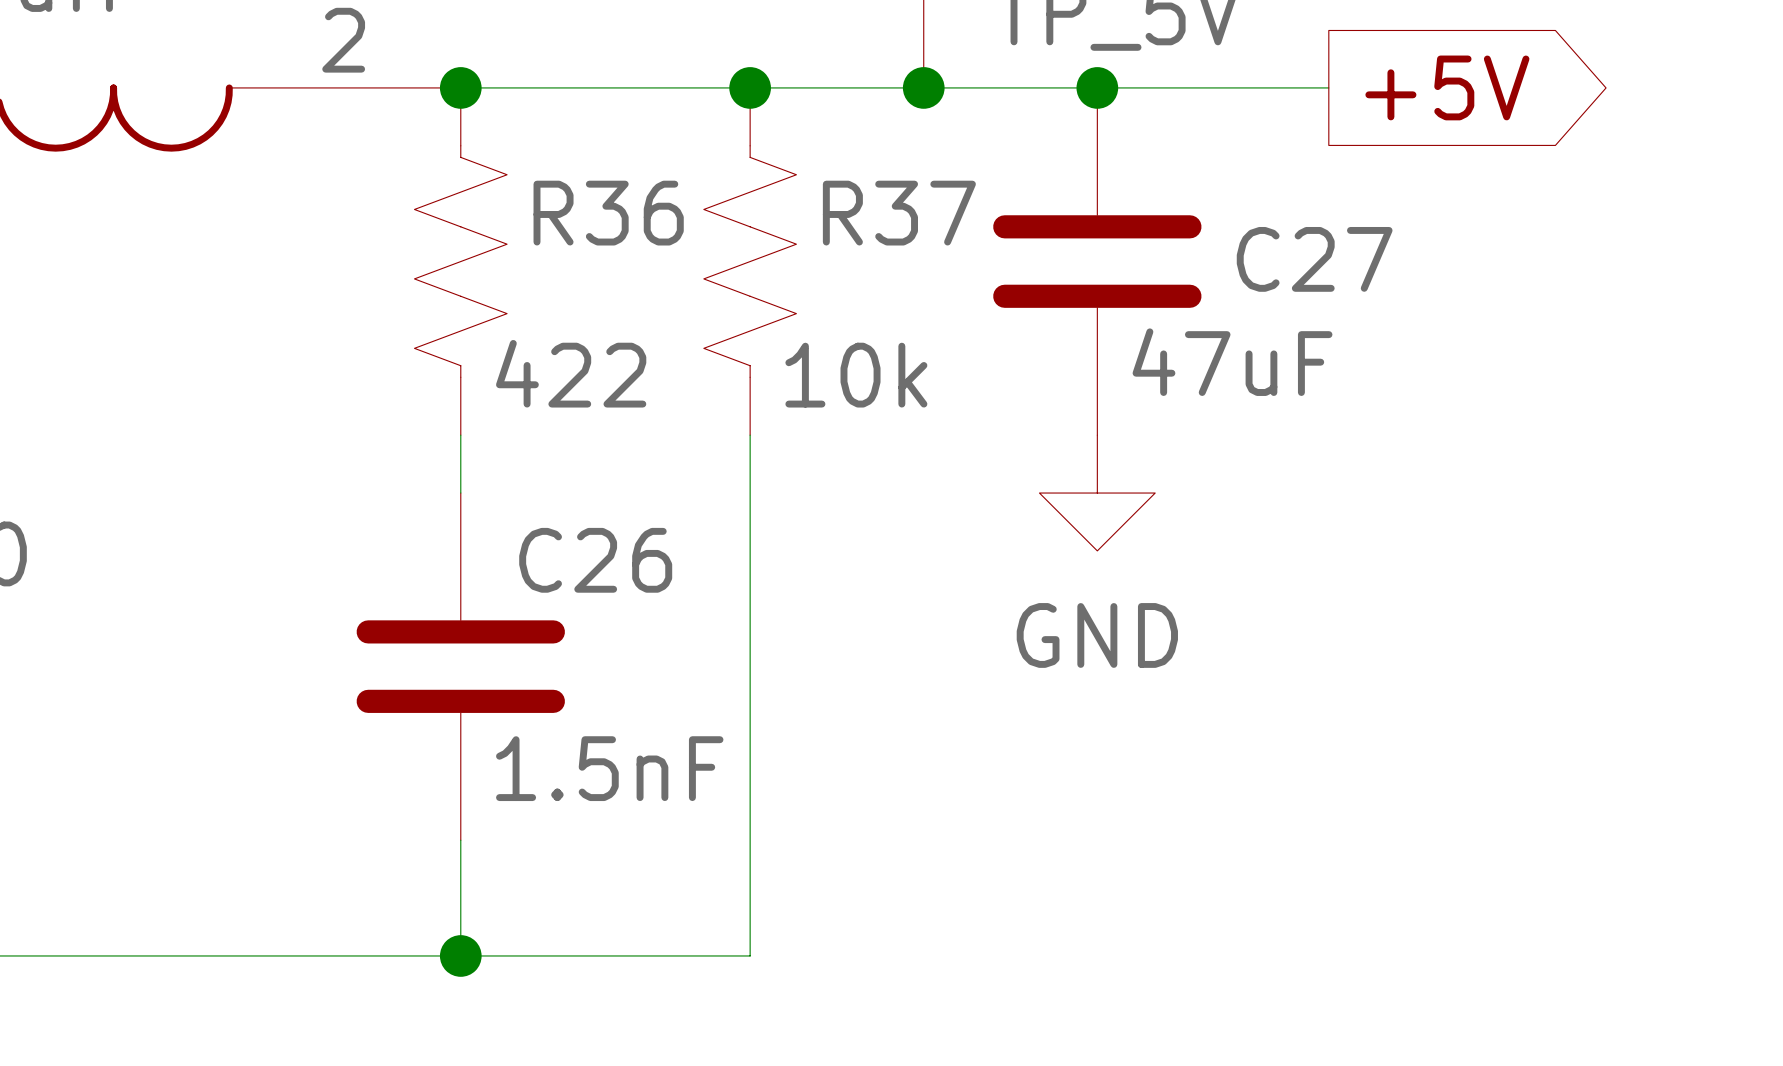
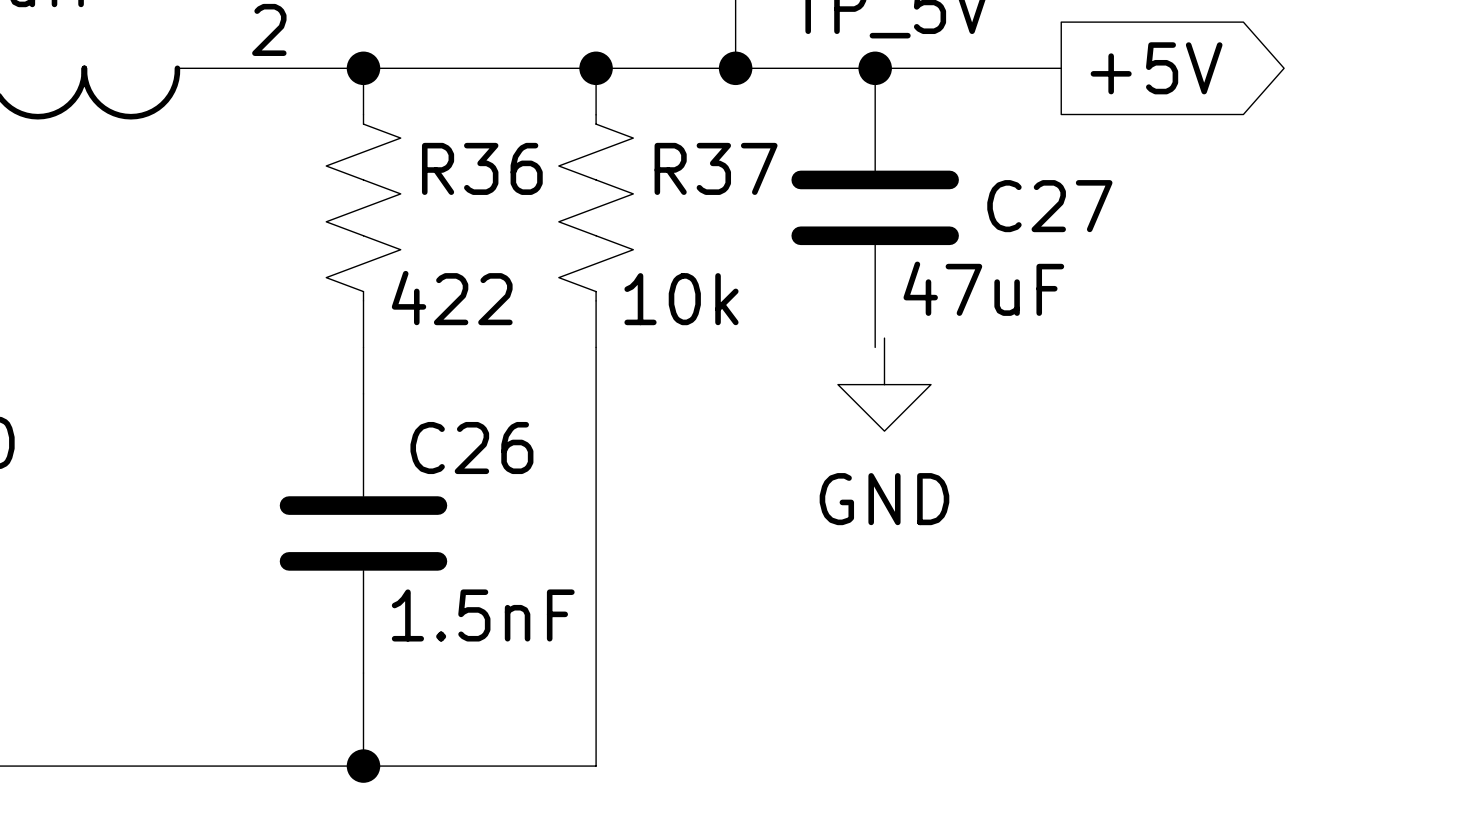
power symbol position: GND (1097, 493) -> GND (884, 384)

